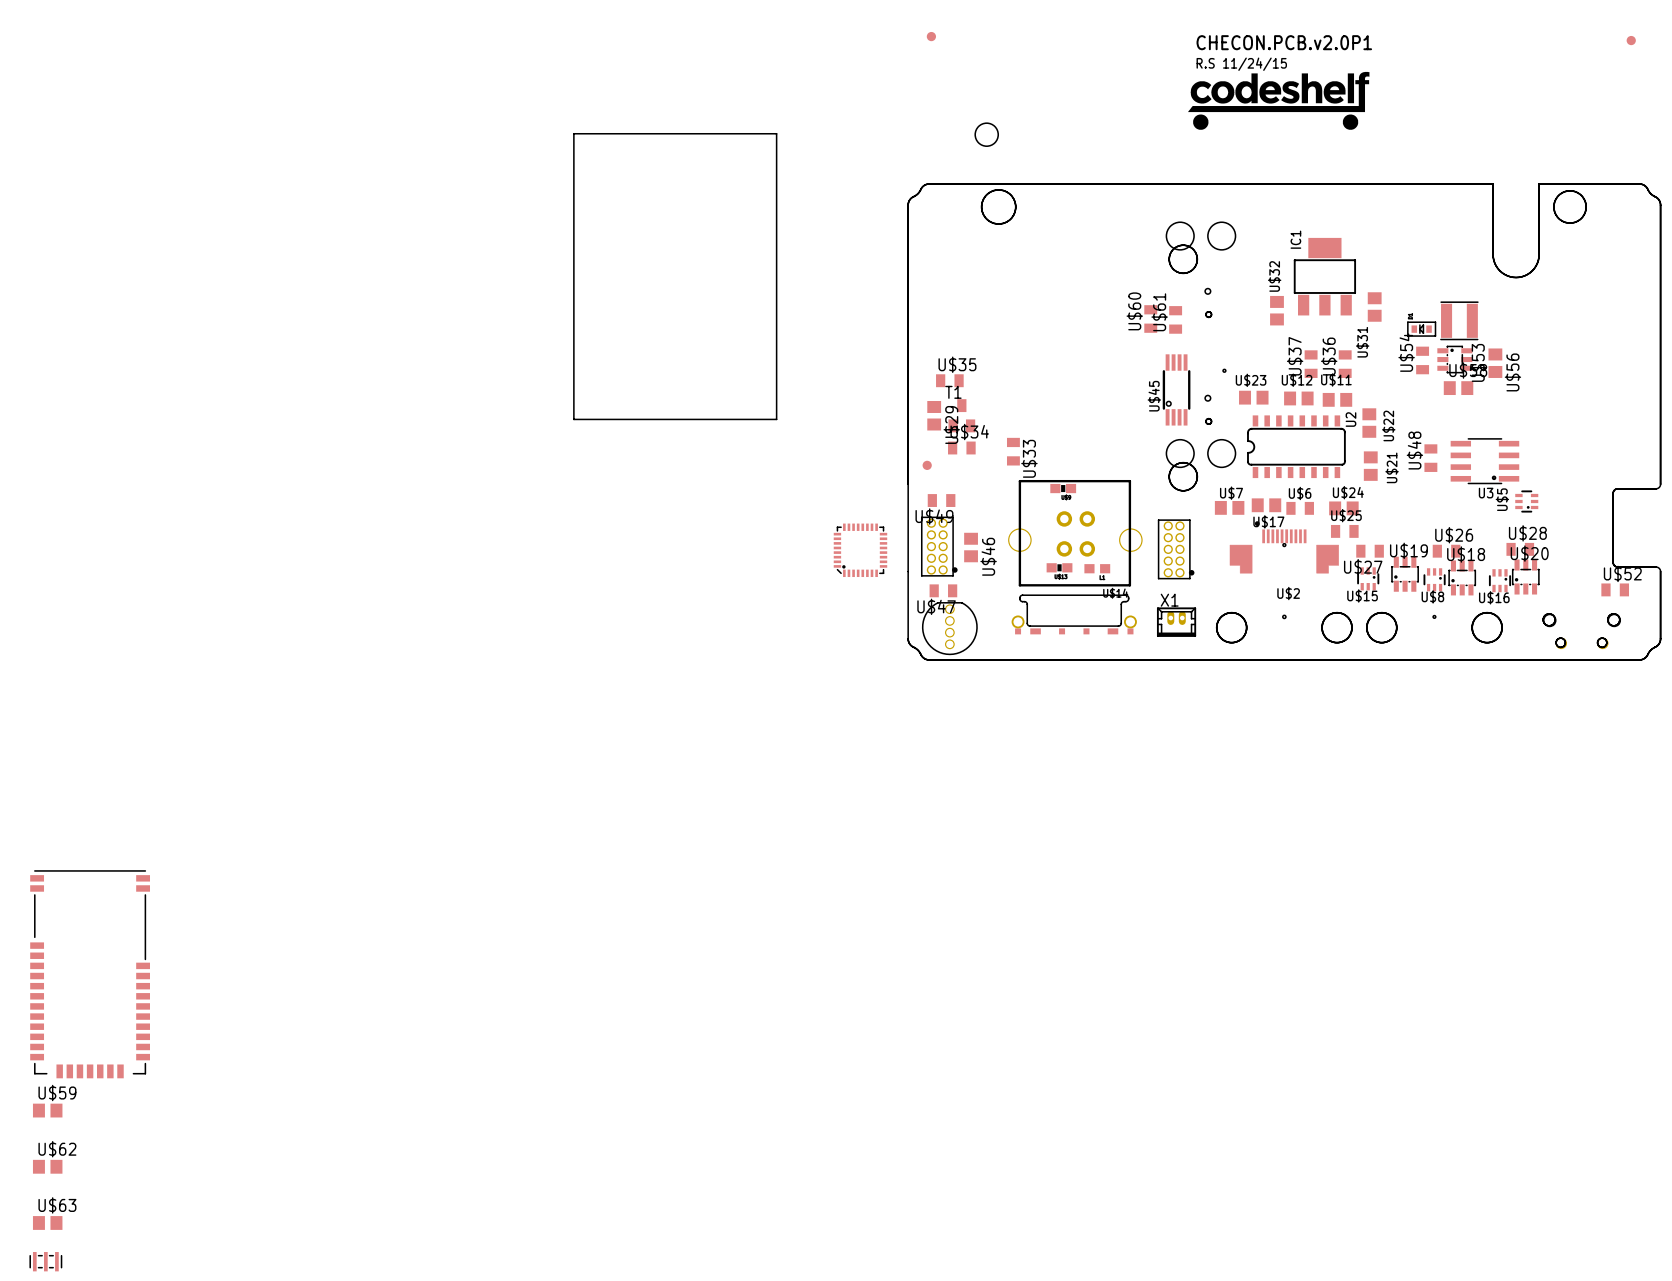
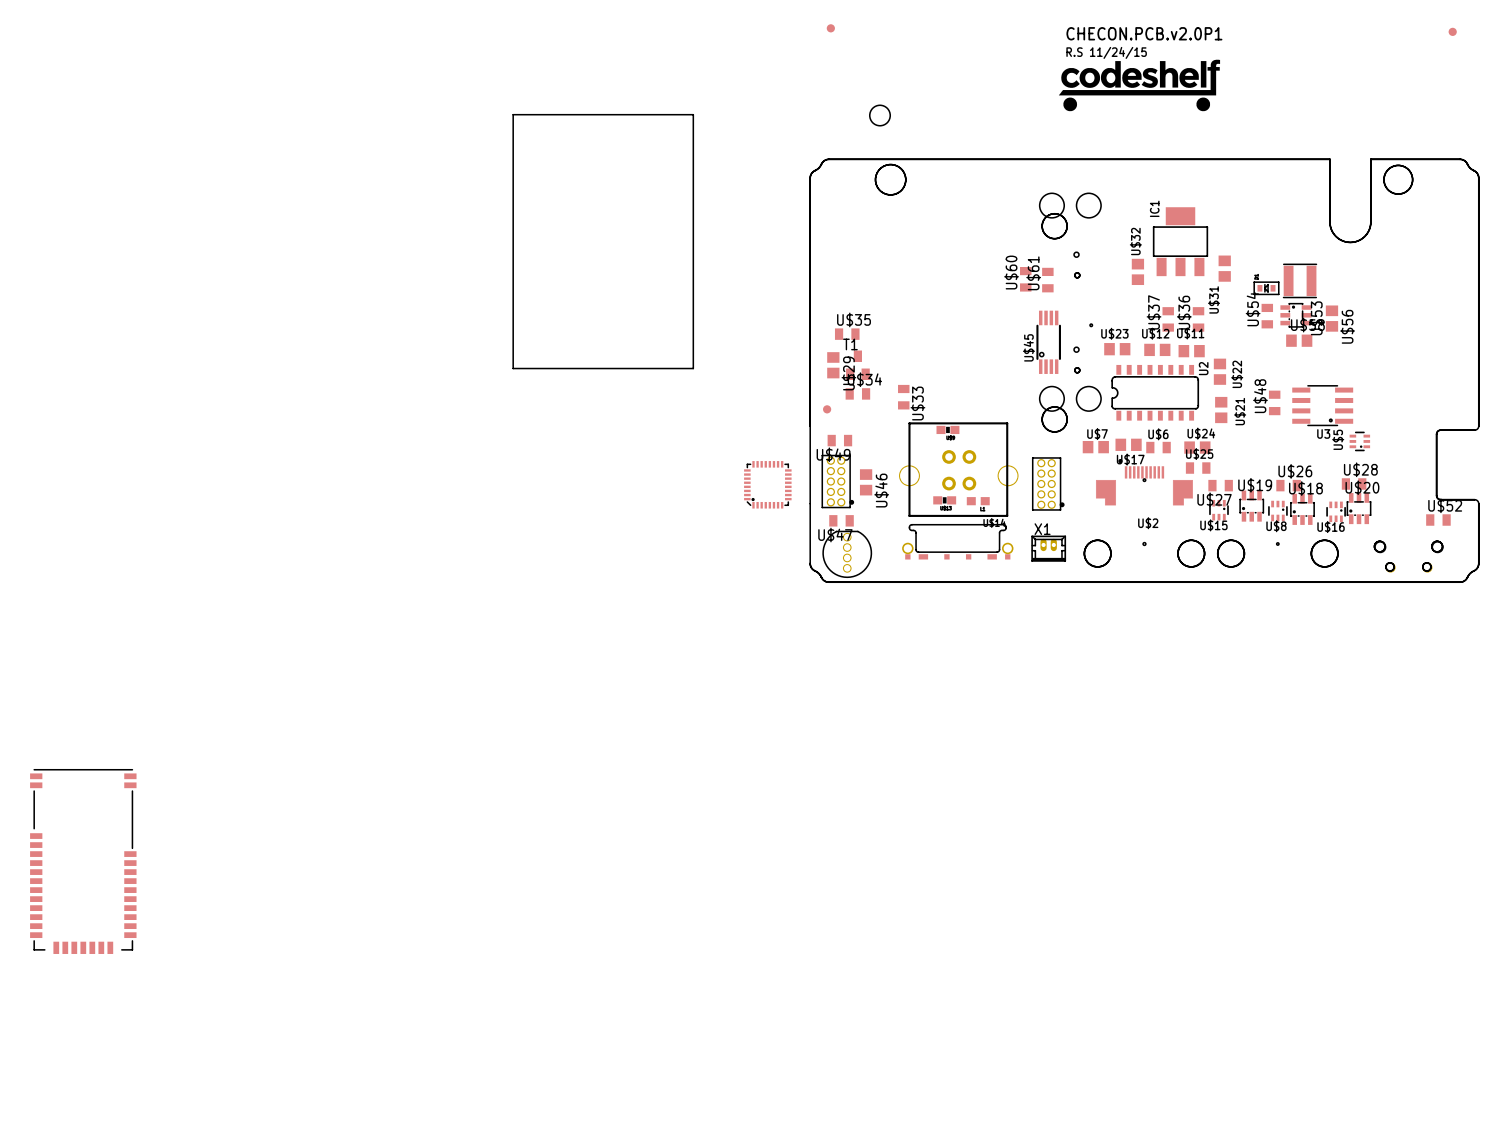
U$59: (47, 1110) -> none
U$62: (47, 1166) -> none
U$63: (47, 1222) -> none
part: (45, 1261) -> none

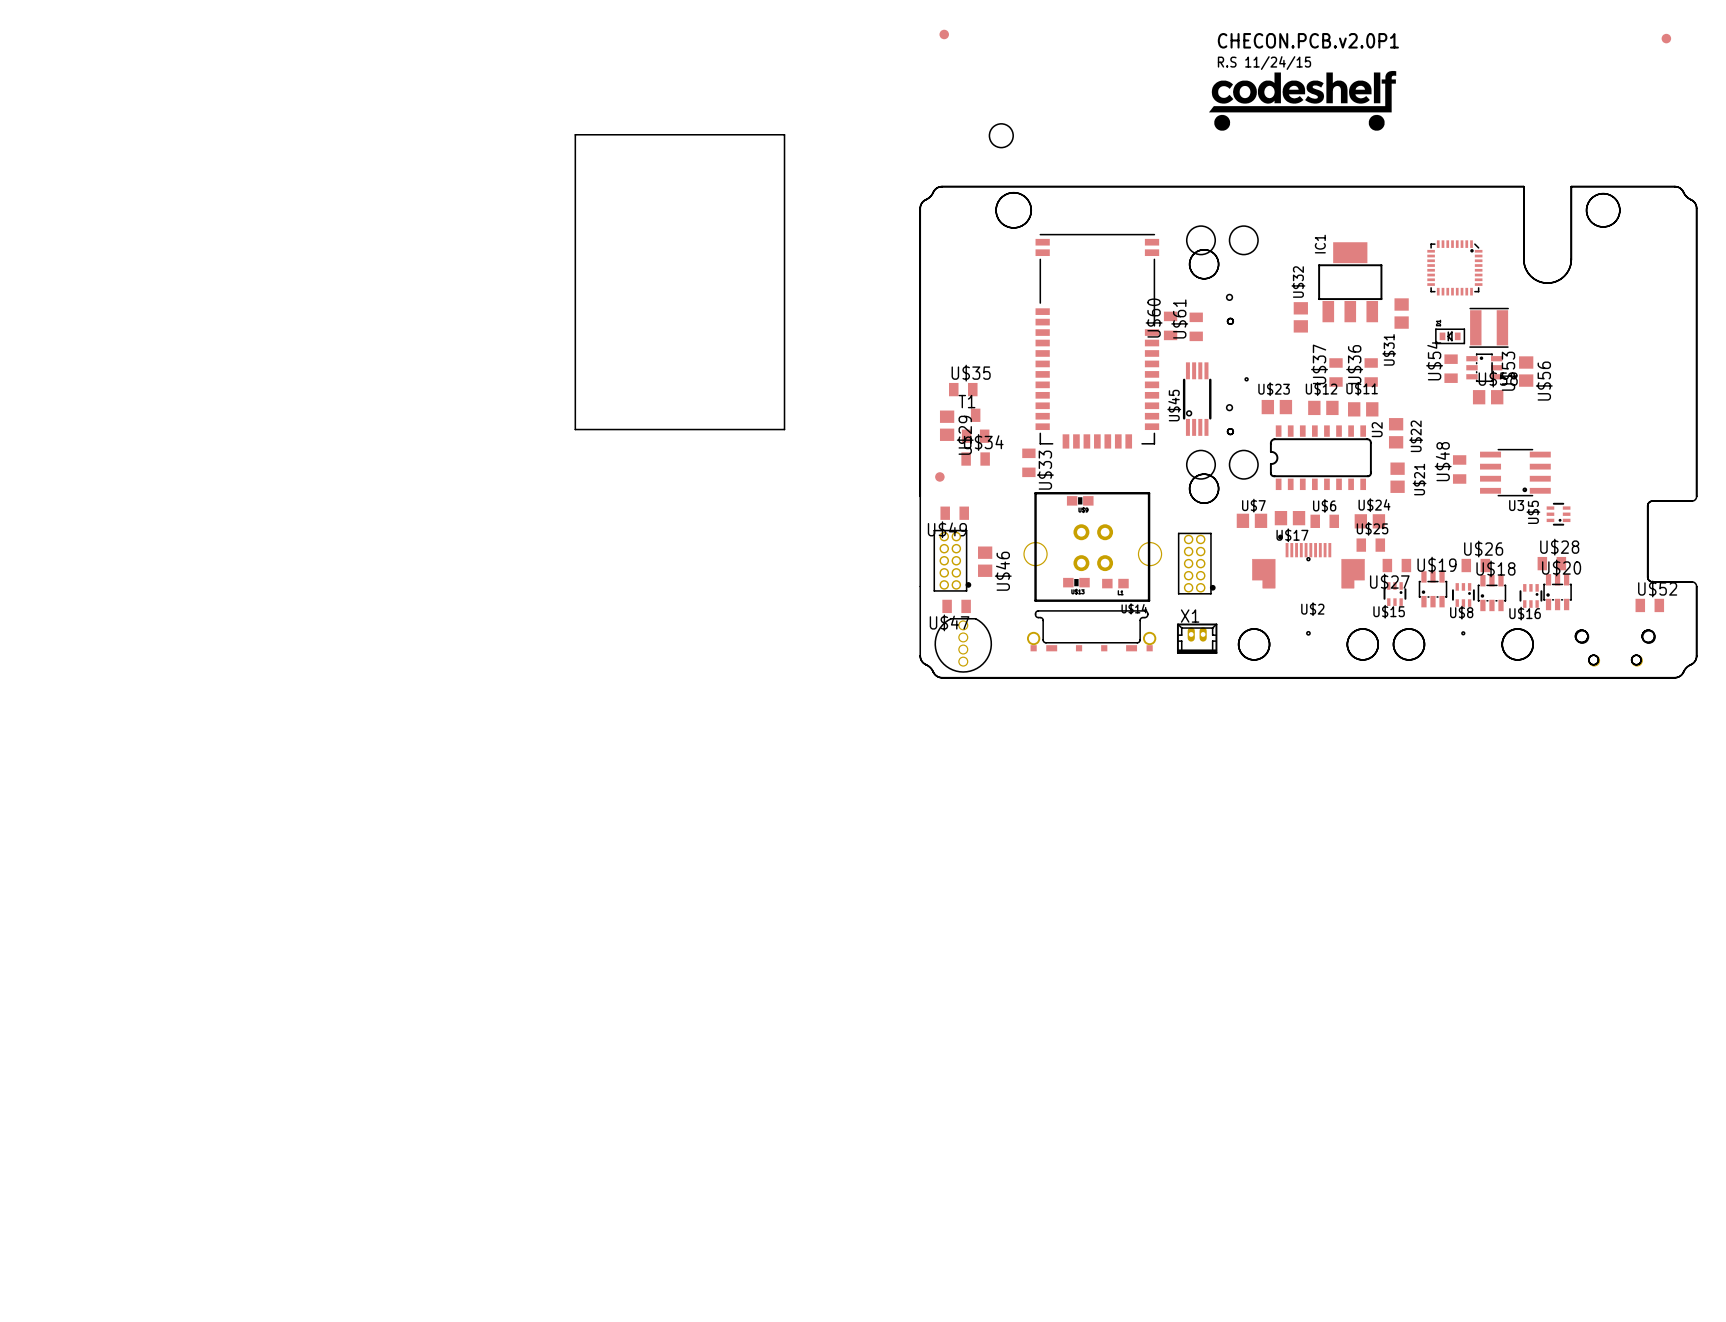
part: none -> (1454, 267)
part: none -> (1097, 341)
part: (767, 484) -> none
part: (83, 861) -> none

